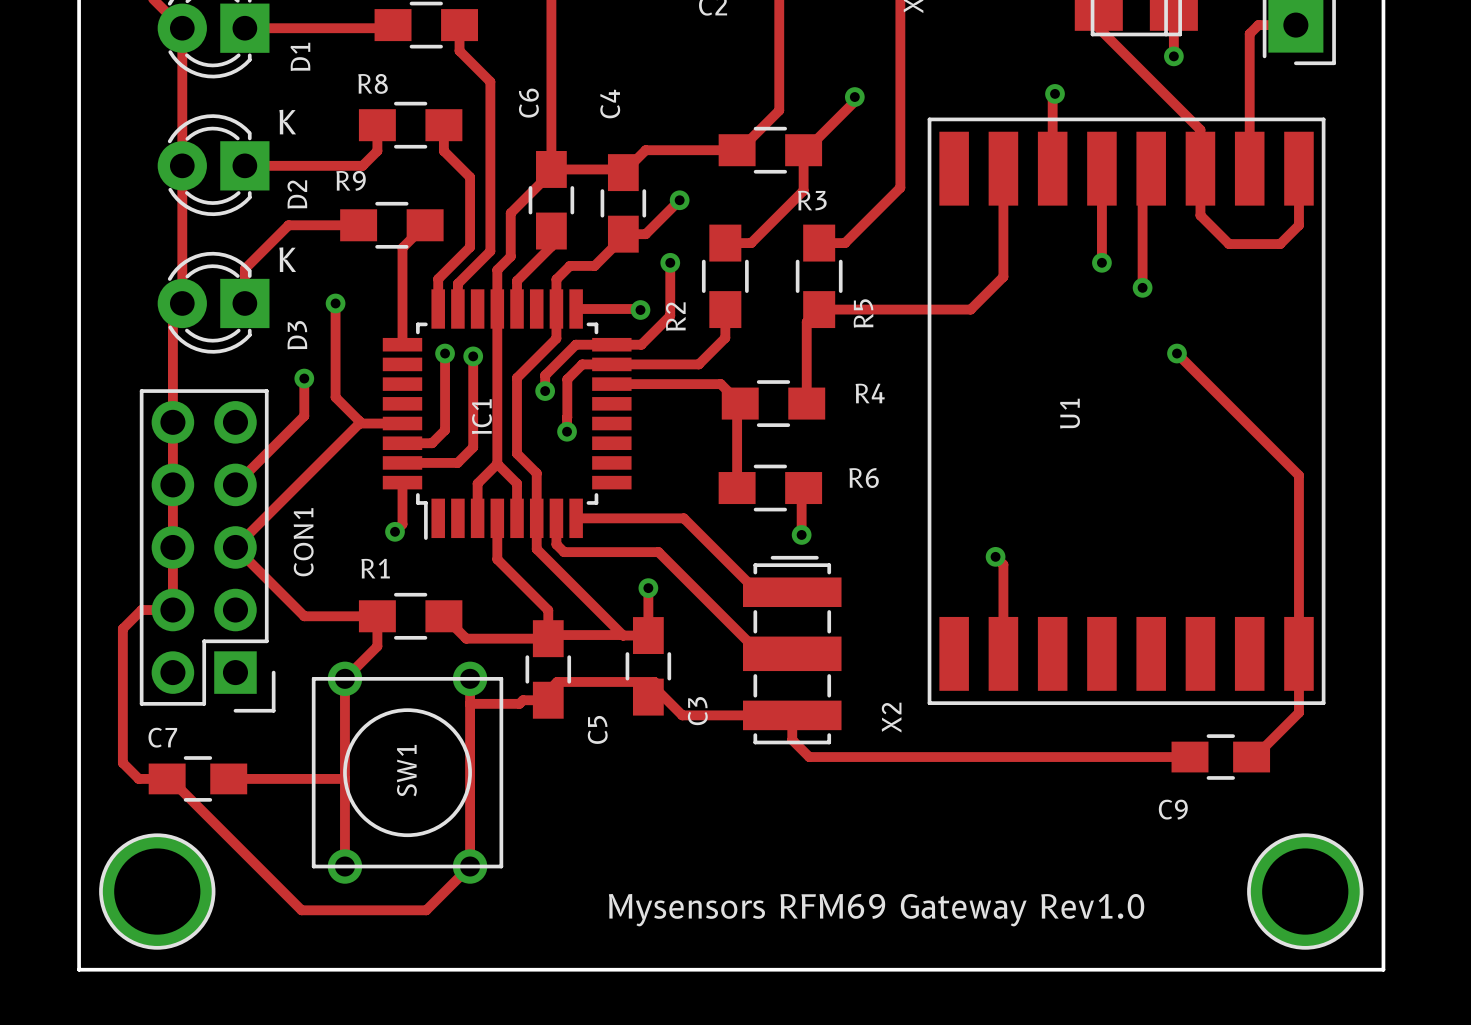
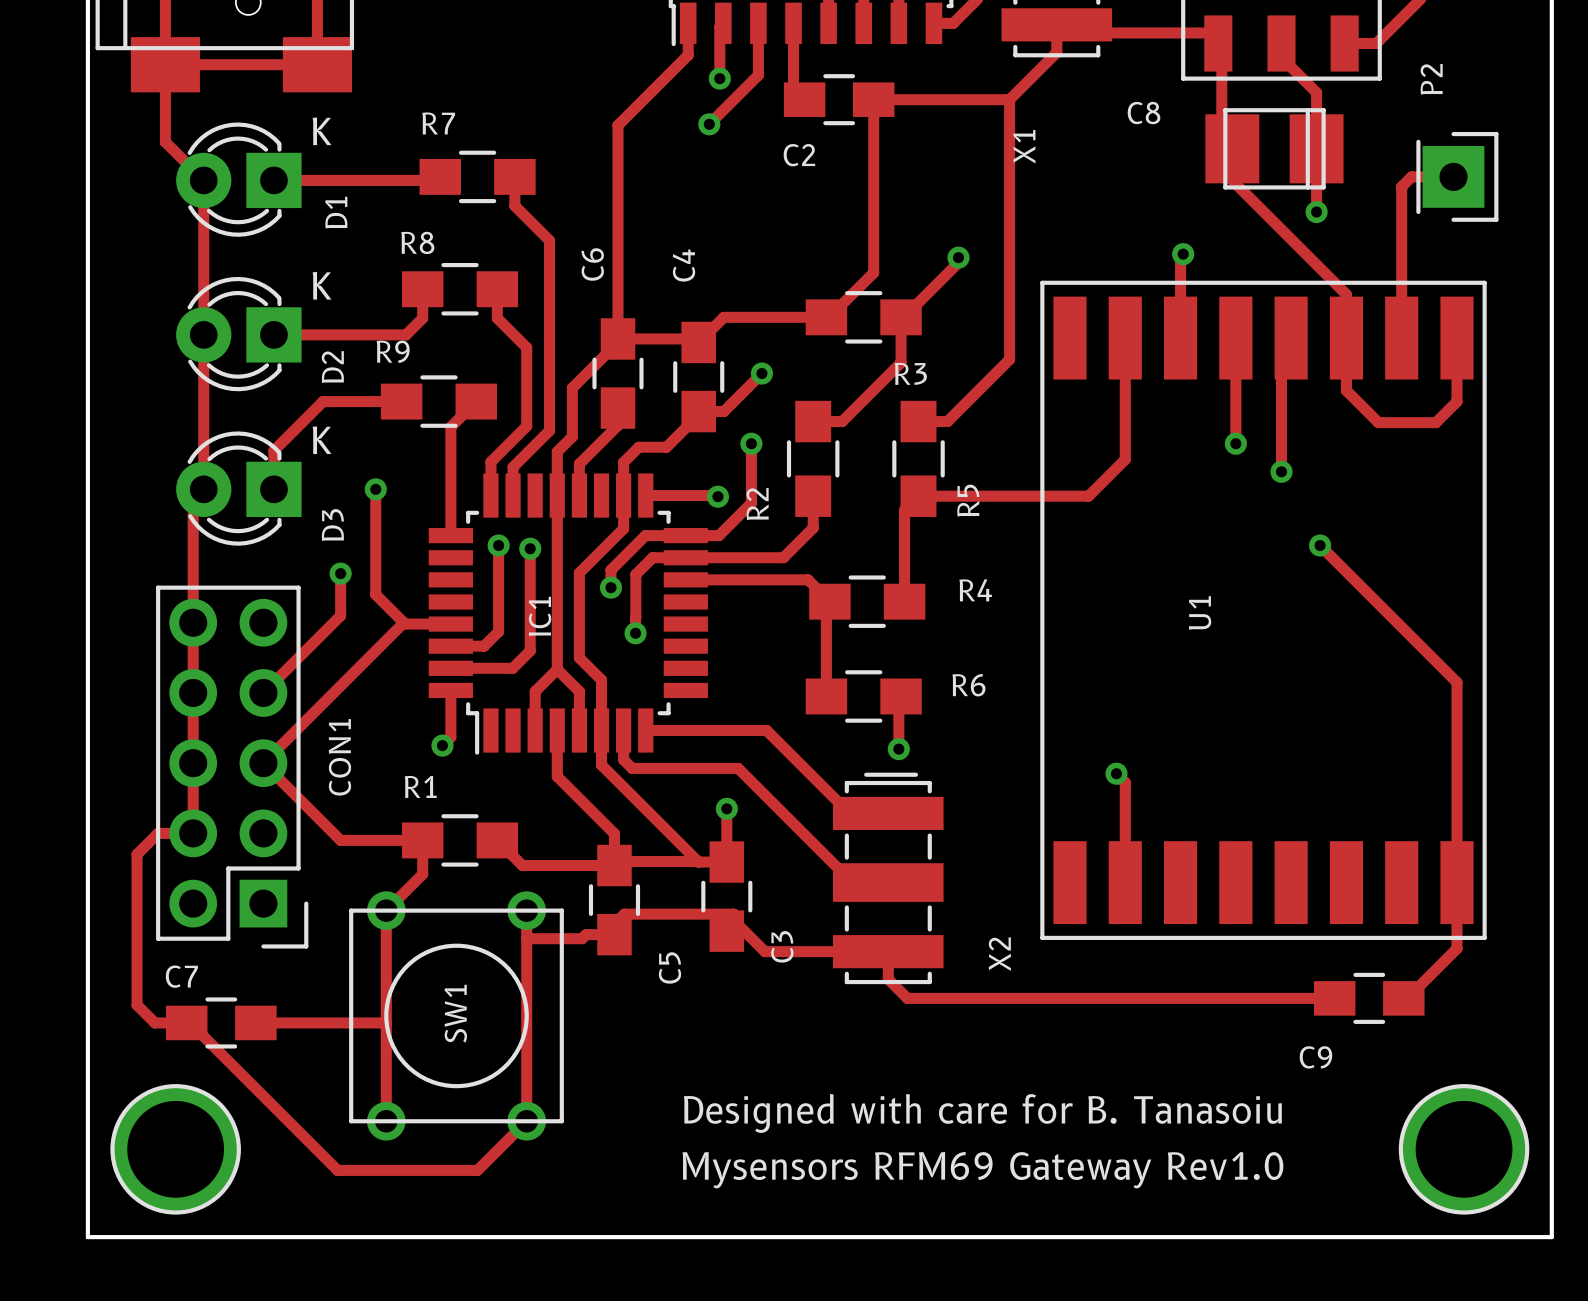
text: none -> Designed with care for B. Tanasoiu (982, 1113)

